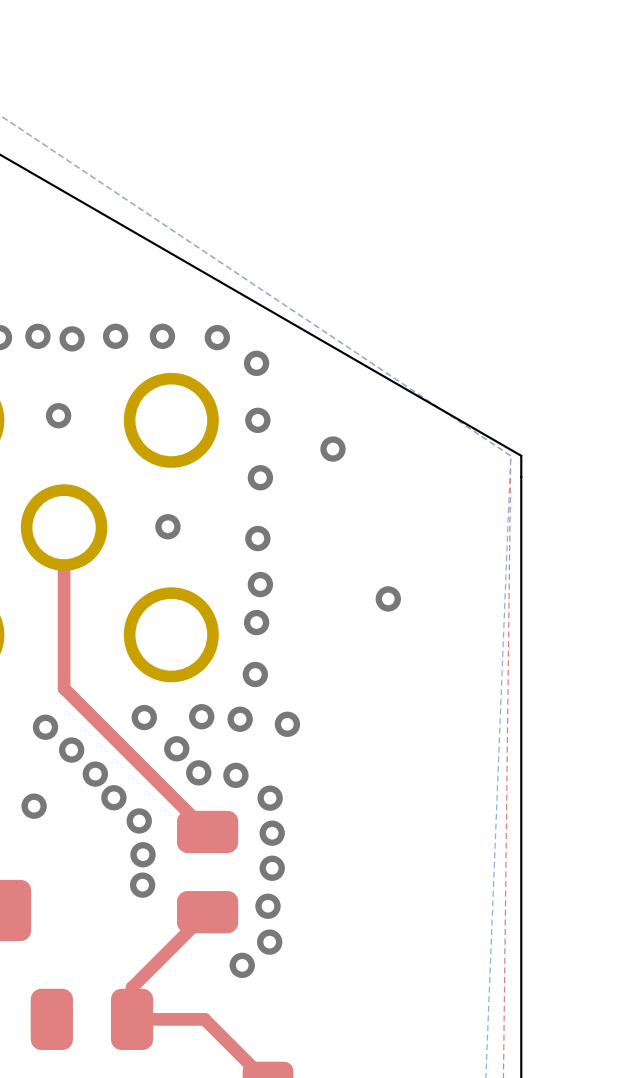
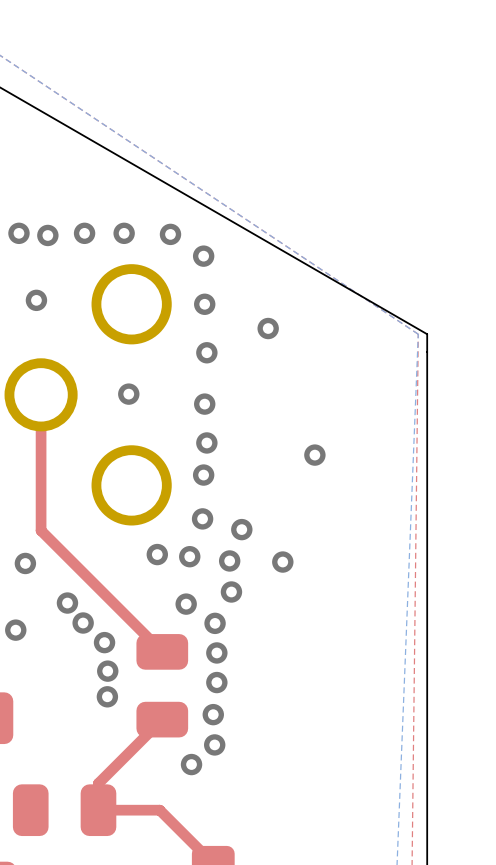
via: none -> (241, 529)
via: (144, 717) -> none
via: none -> (282, 562)
via: (176, 748) -> none
via: (71, 750) -> none
via: none -> (231, 591)
via: (198, 772) -> none

